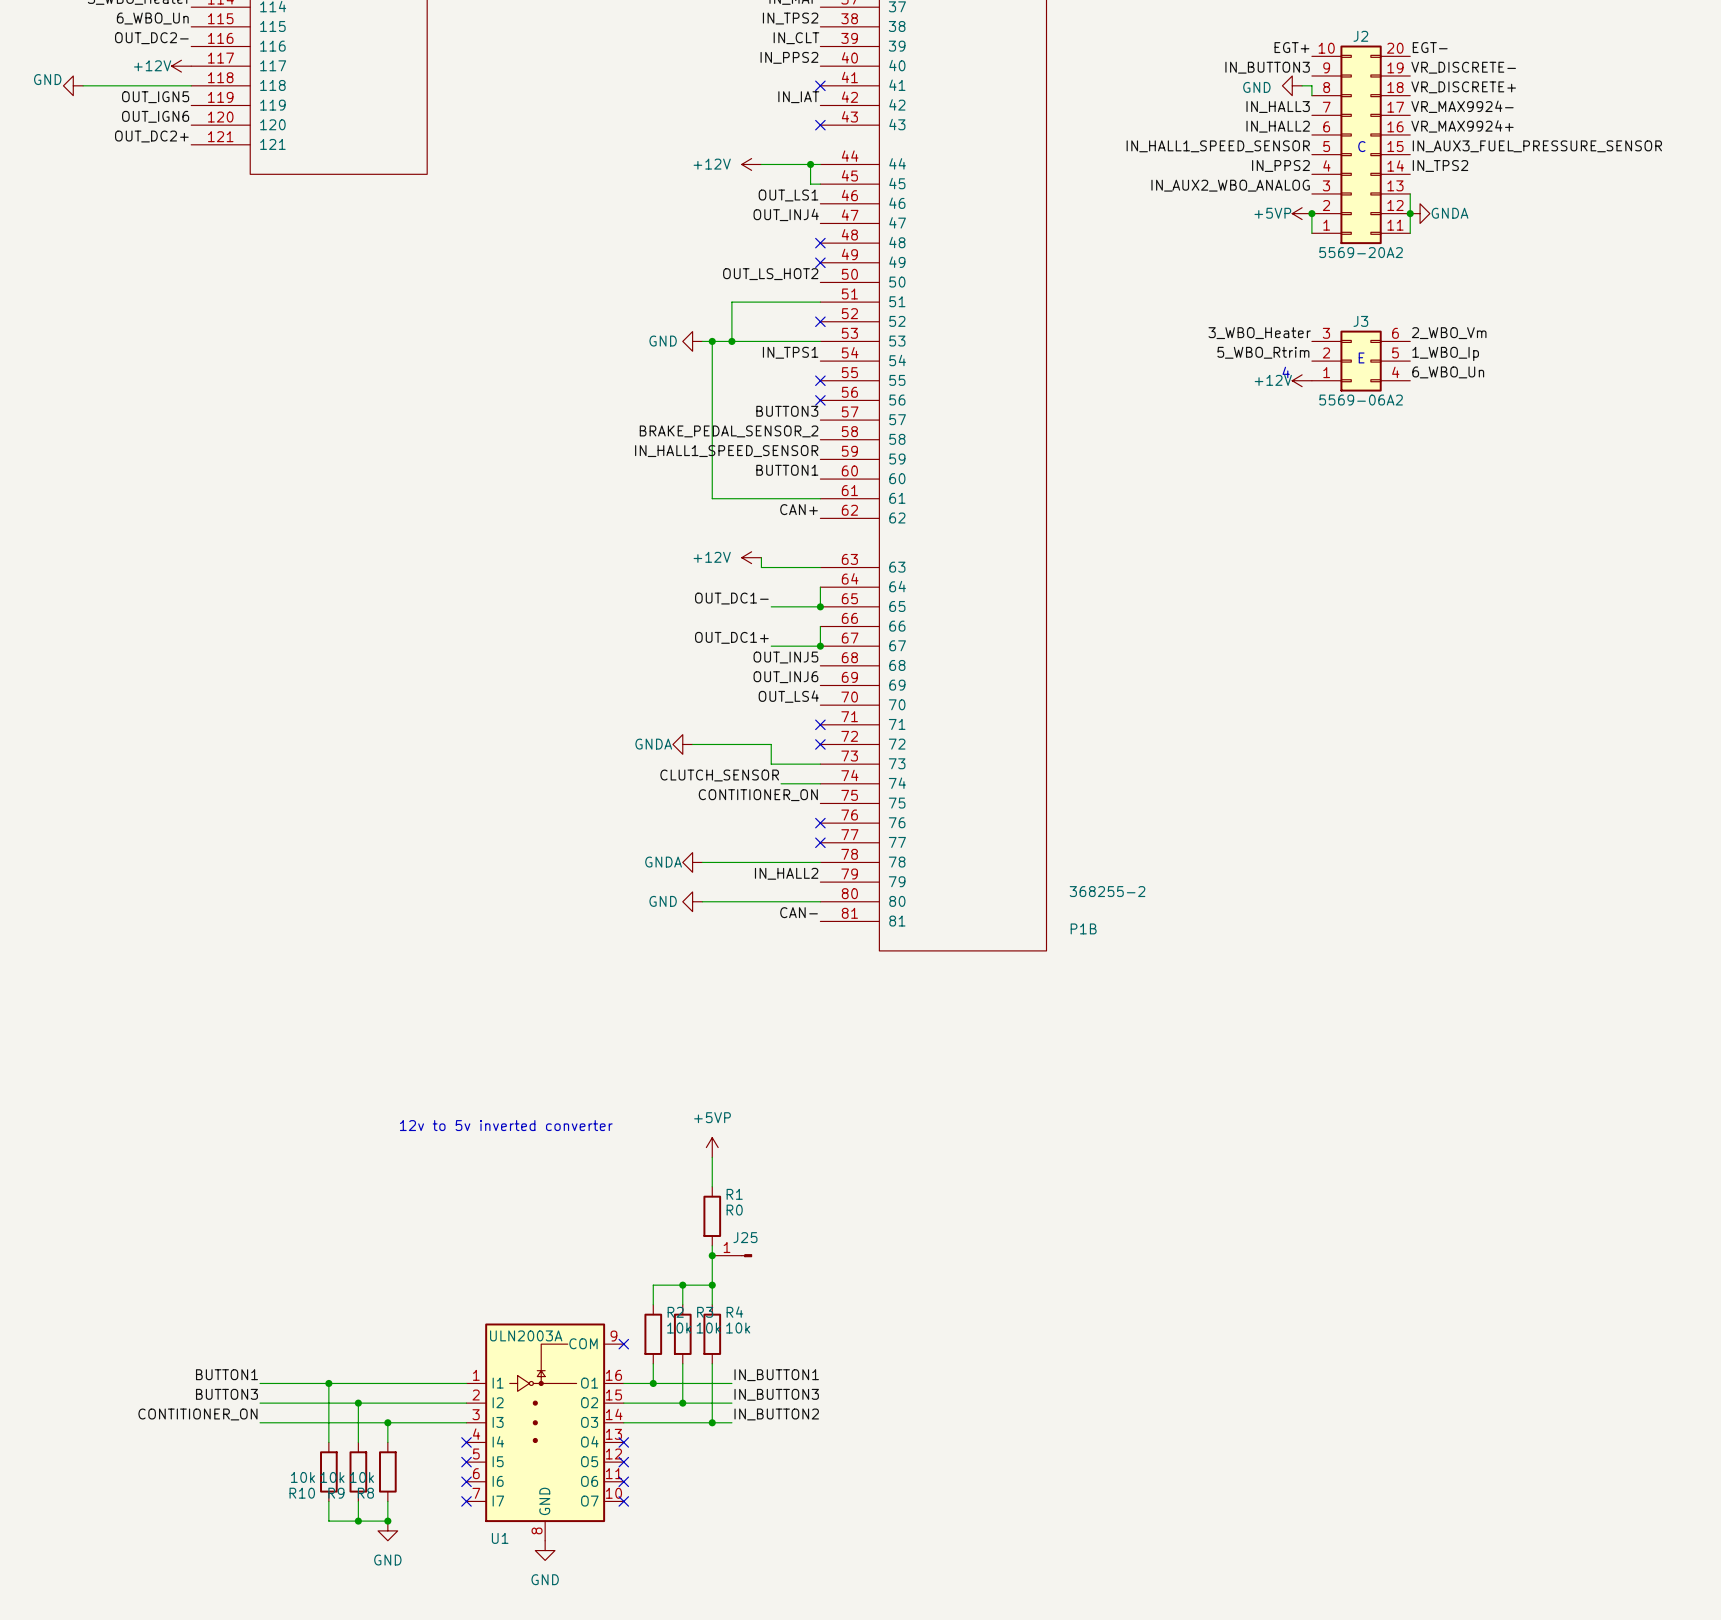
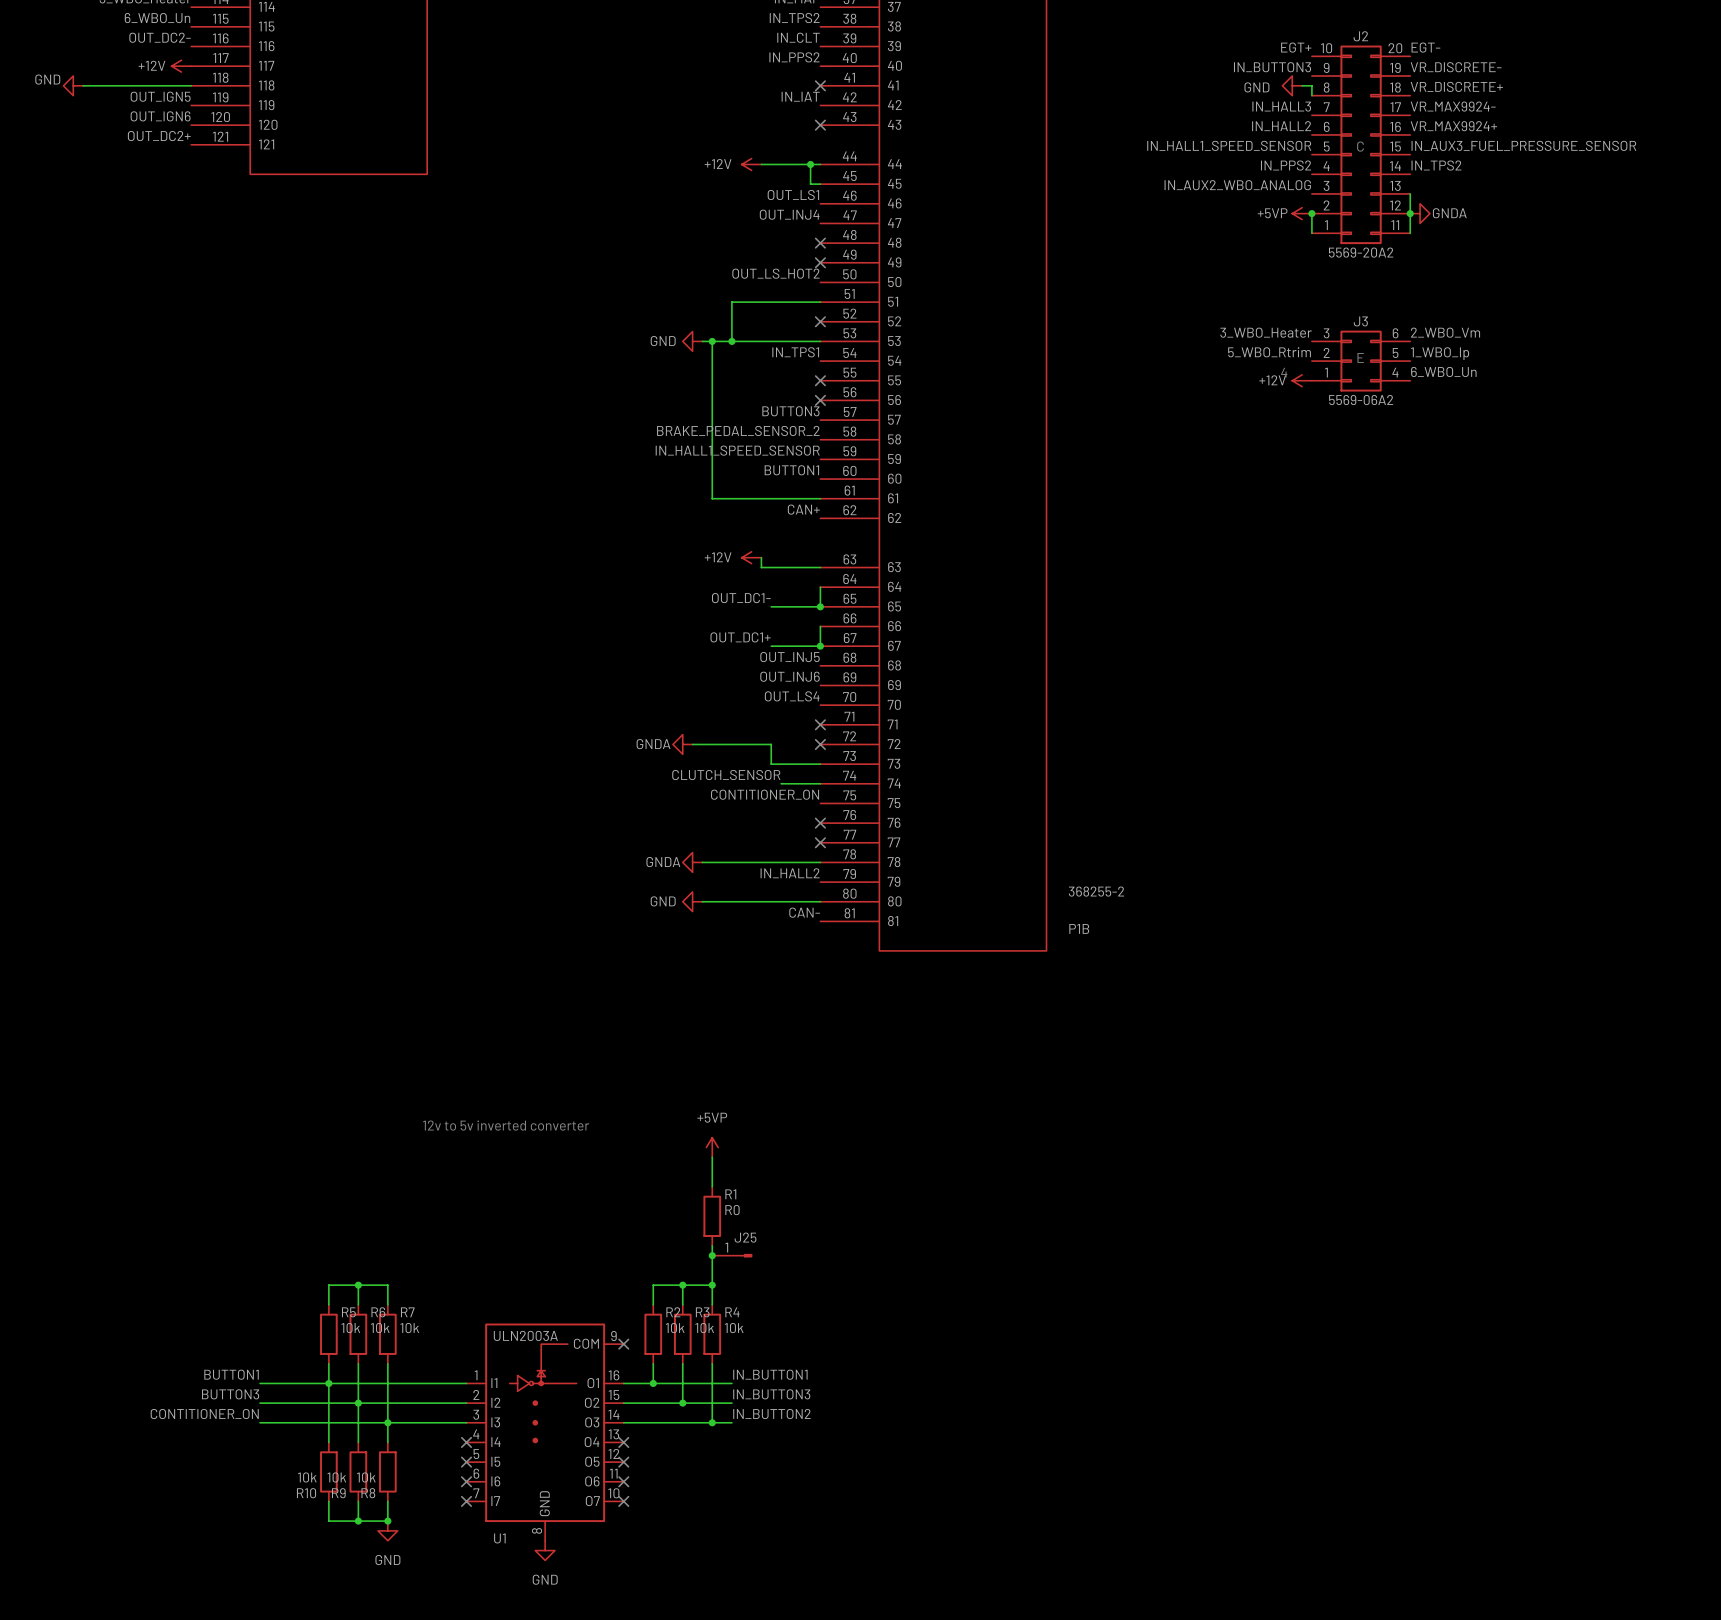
wire: none -> (358, 1285) (358, 1304)
junction: none -> (358, 1285)
wire: none -> (328, 1304) (328, 1285) (387, 1285) (387, 1304)
R5: none -> 10k (328, 1334)
R6: none -> 10k (358, 1334)
R7: none -> 10k (387, 1334)
wire: none -> (328, 1363) (328, 1383)
wire: none -> (358, 1363) (358, 1403)
wire: none -> (387, 1363) (387, 1422)

